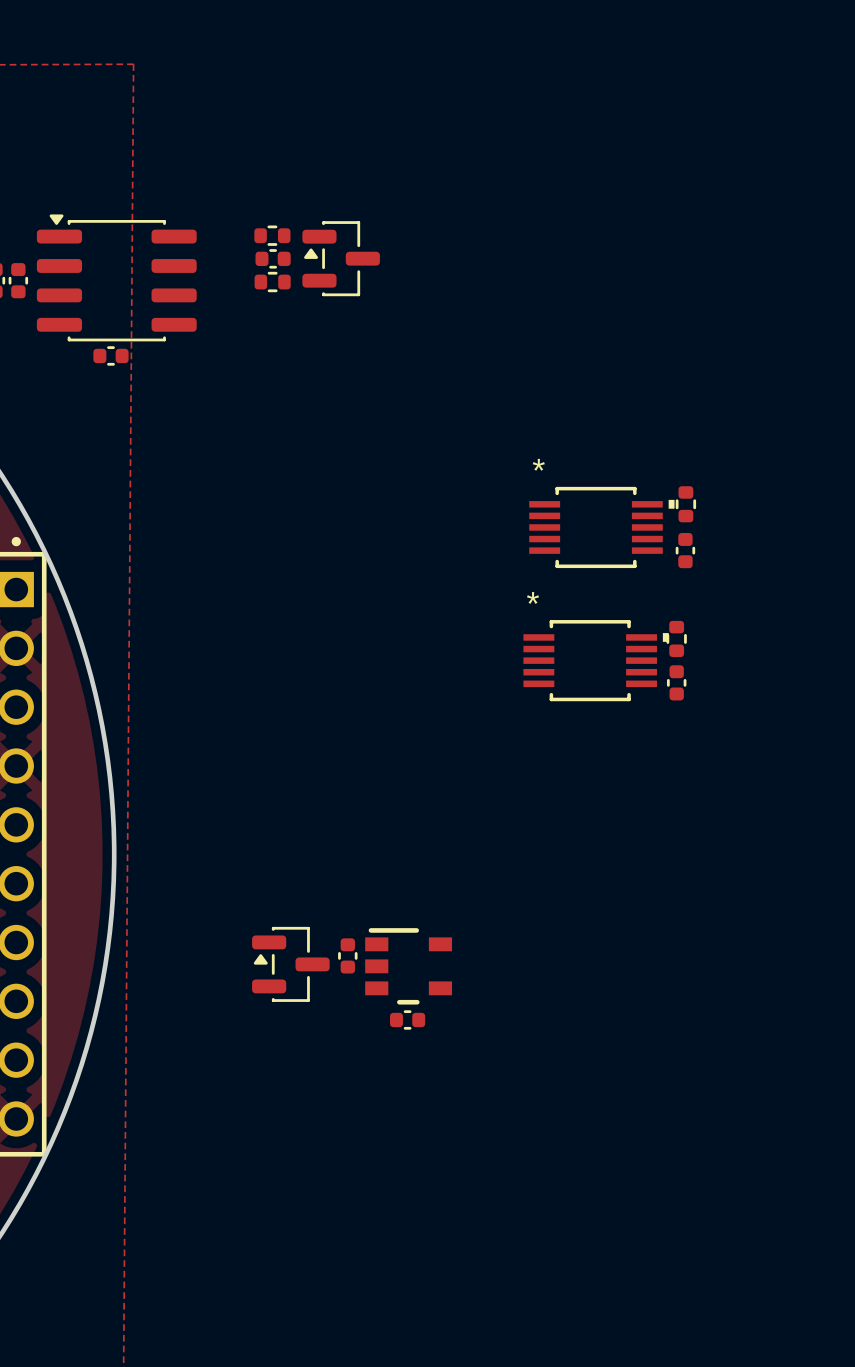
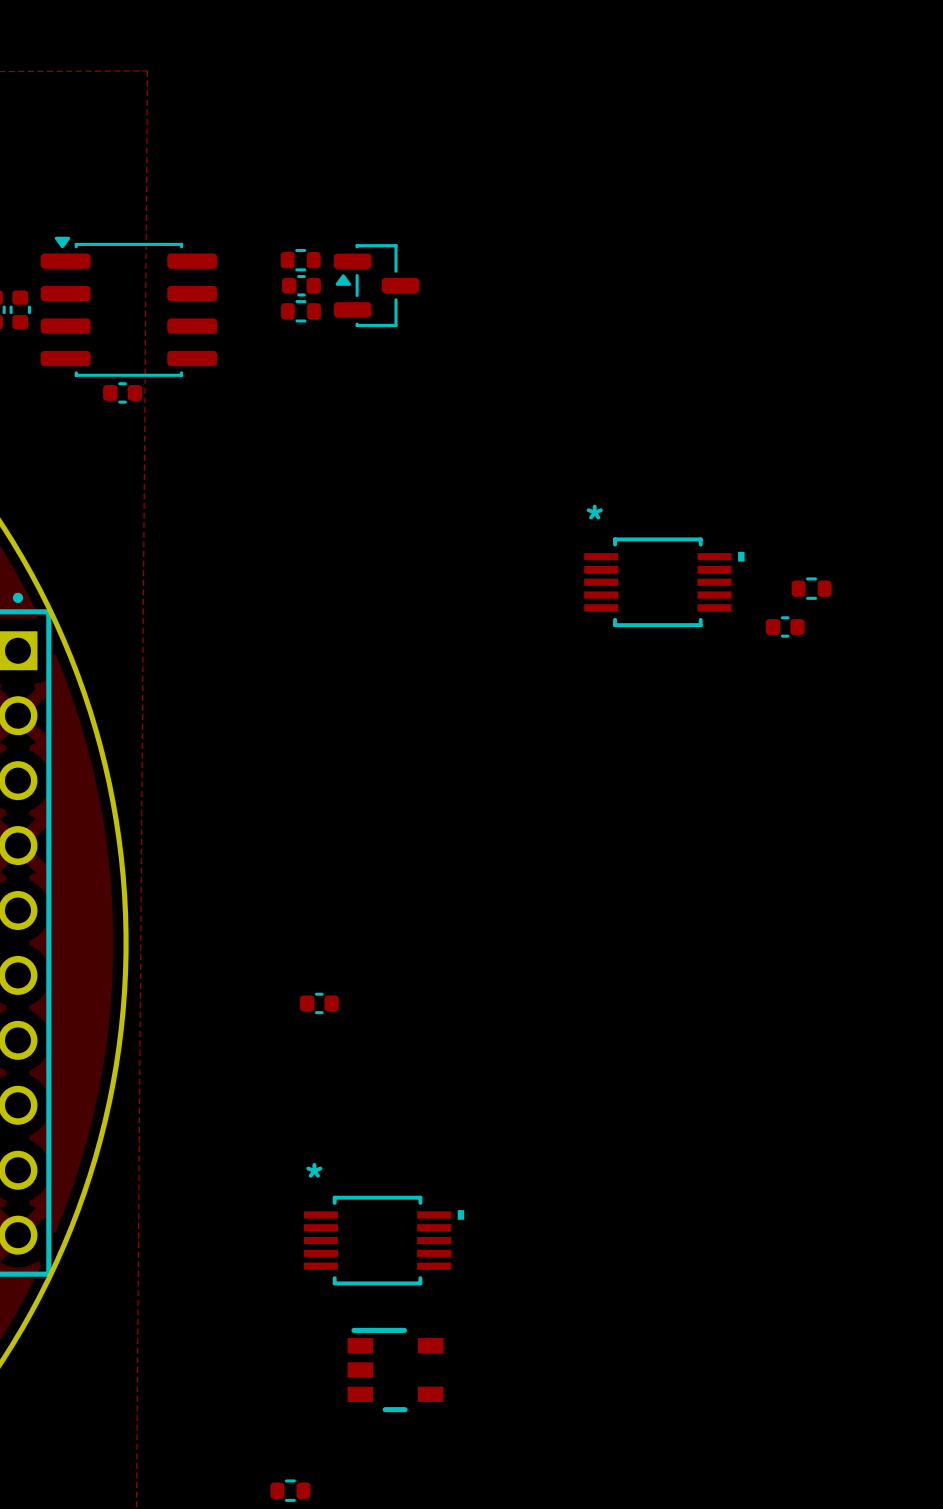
part rotation: 0° (685, 504) -> 90° clockwise (811, 588)
part position: (685, 504) -> (811, 588)
part rotation: 0° (685, 550) -> 90° clockwise (785, 626)
part position: (685, 550) -> (785, 626)
part: (676, 638) -> none
part position: (596, 660) -> (384, 1240)
part: (676, 682) -> none
part rotation: 0° (347, 955) -> 90° clockwise (319, 1003)
part position: (347, 955) -> (319, 1003)
part: (290, 964) -> none
part position: (408, 966) -> (395, 1370)
part: (407, 1019) -> none
part: none -> (290, 1490)

